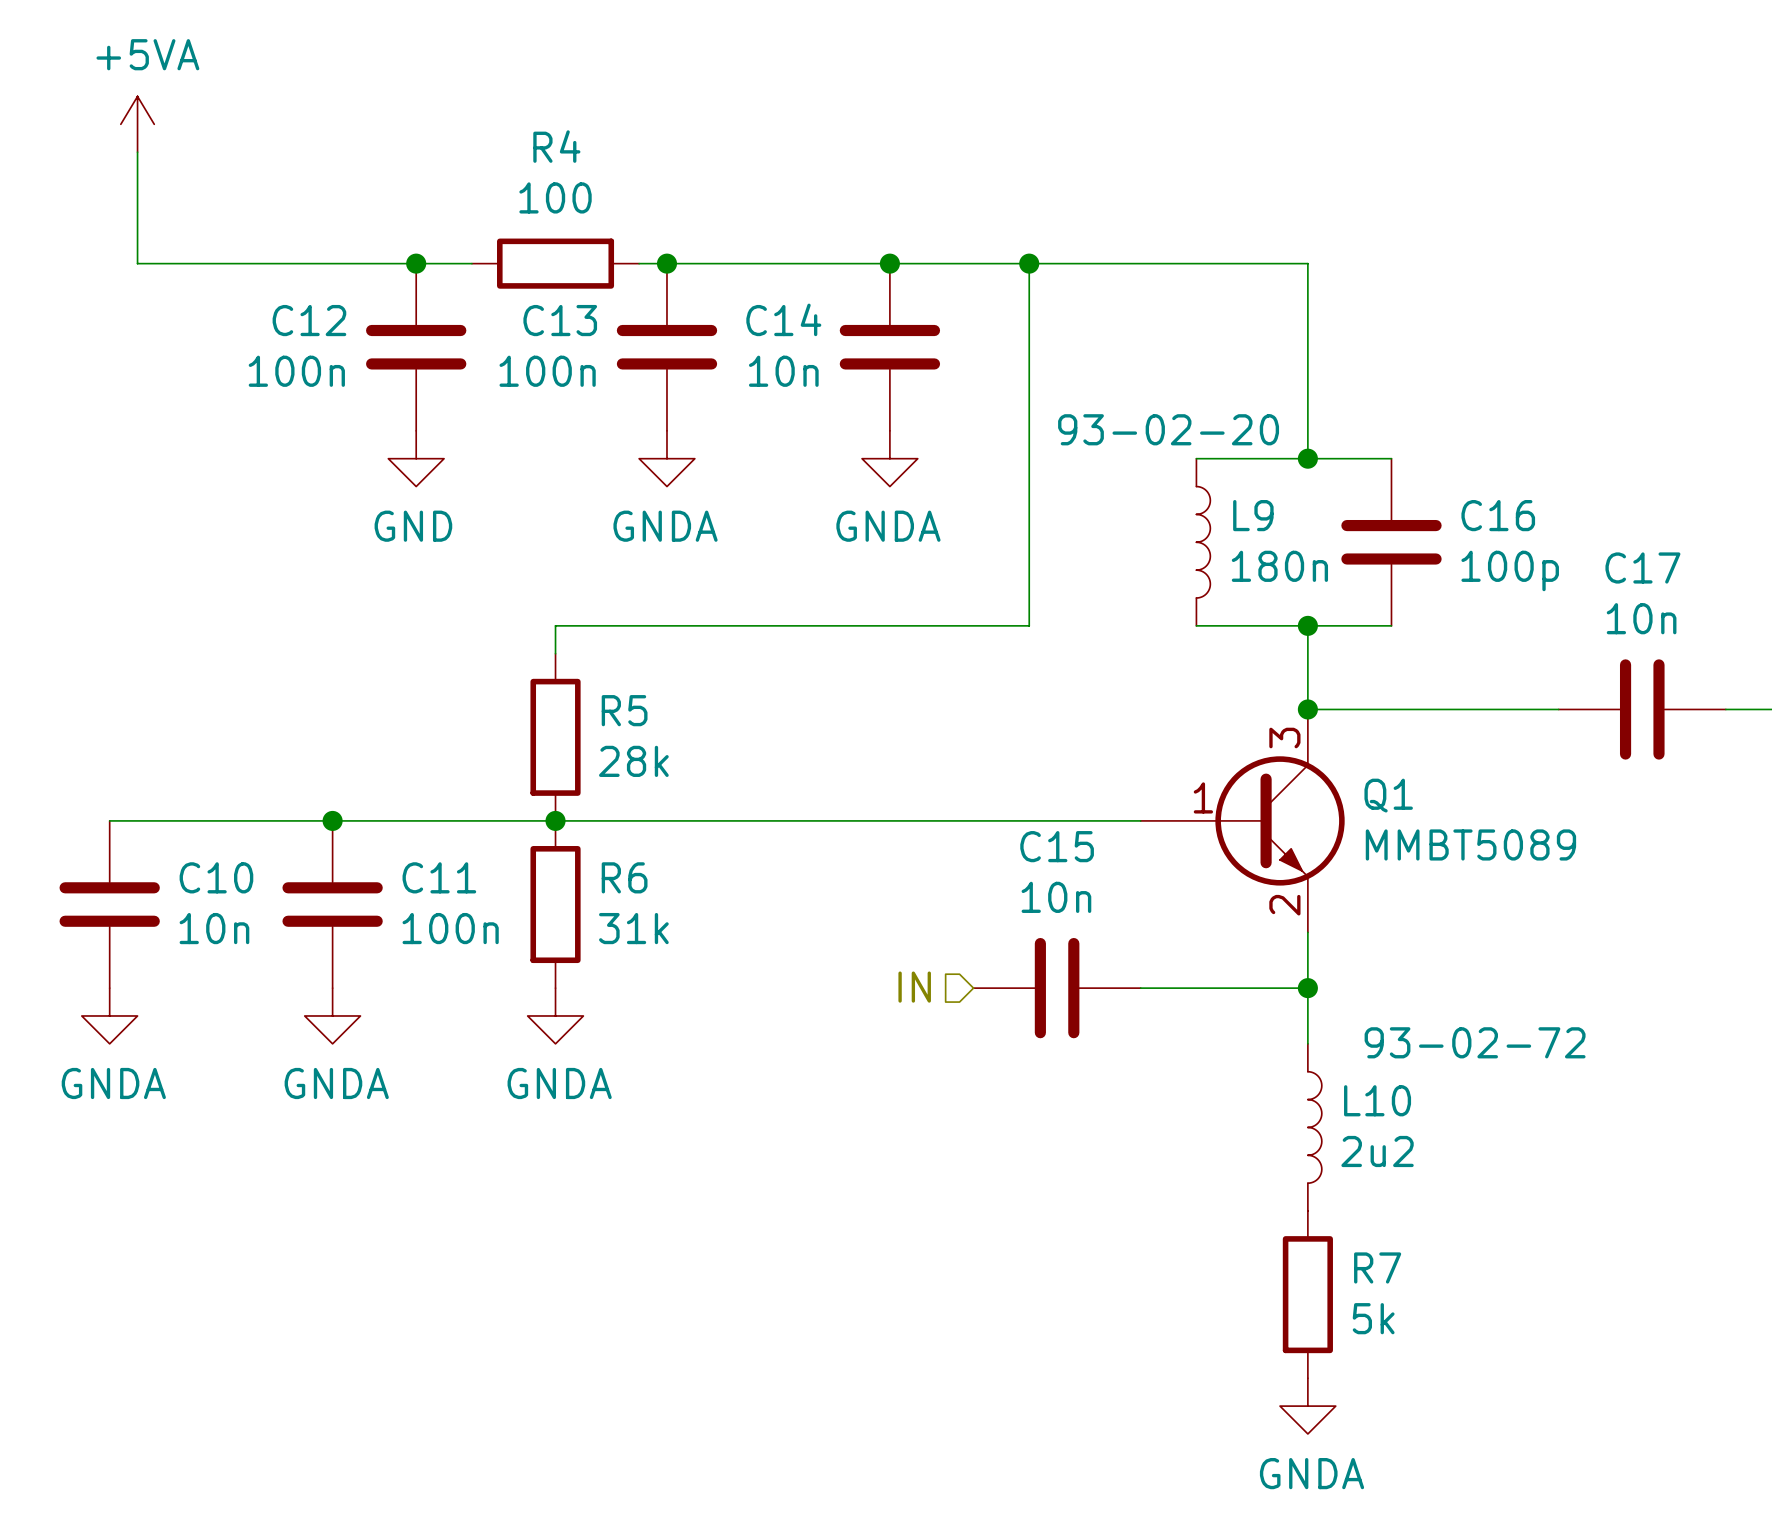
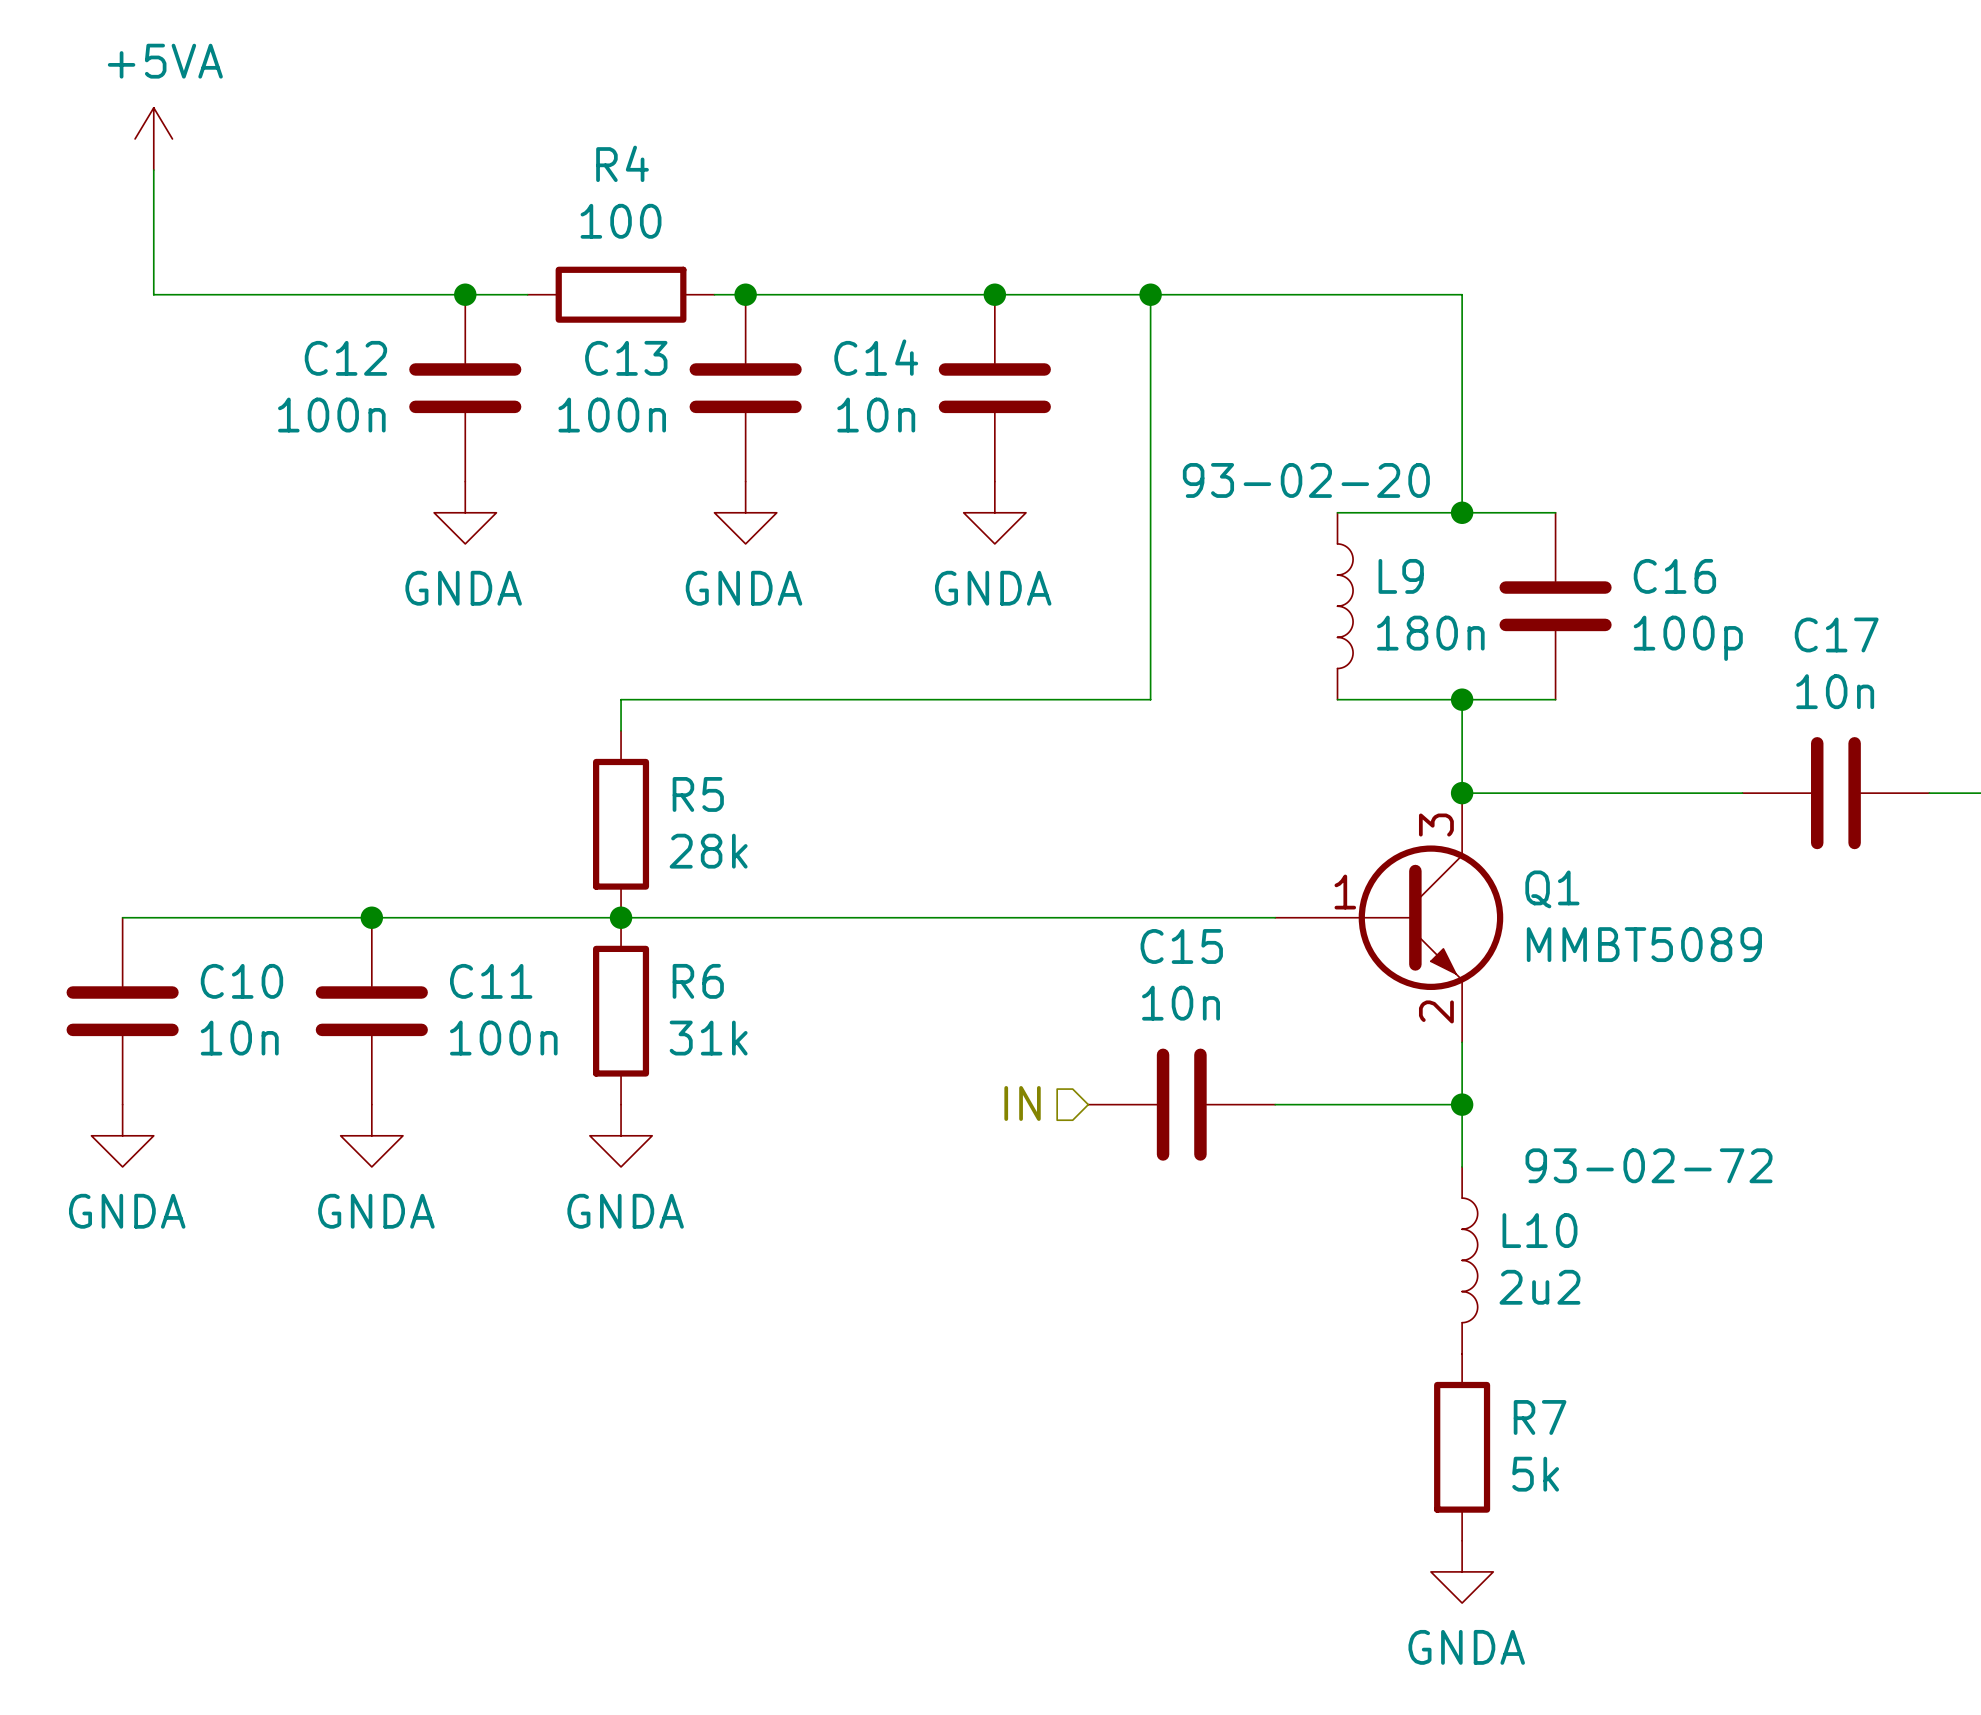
power symbol: GND (416, 458) -> GNDA (465, 512)

